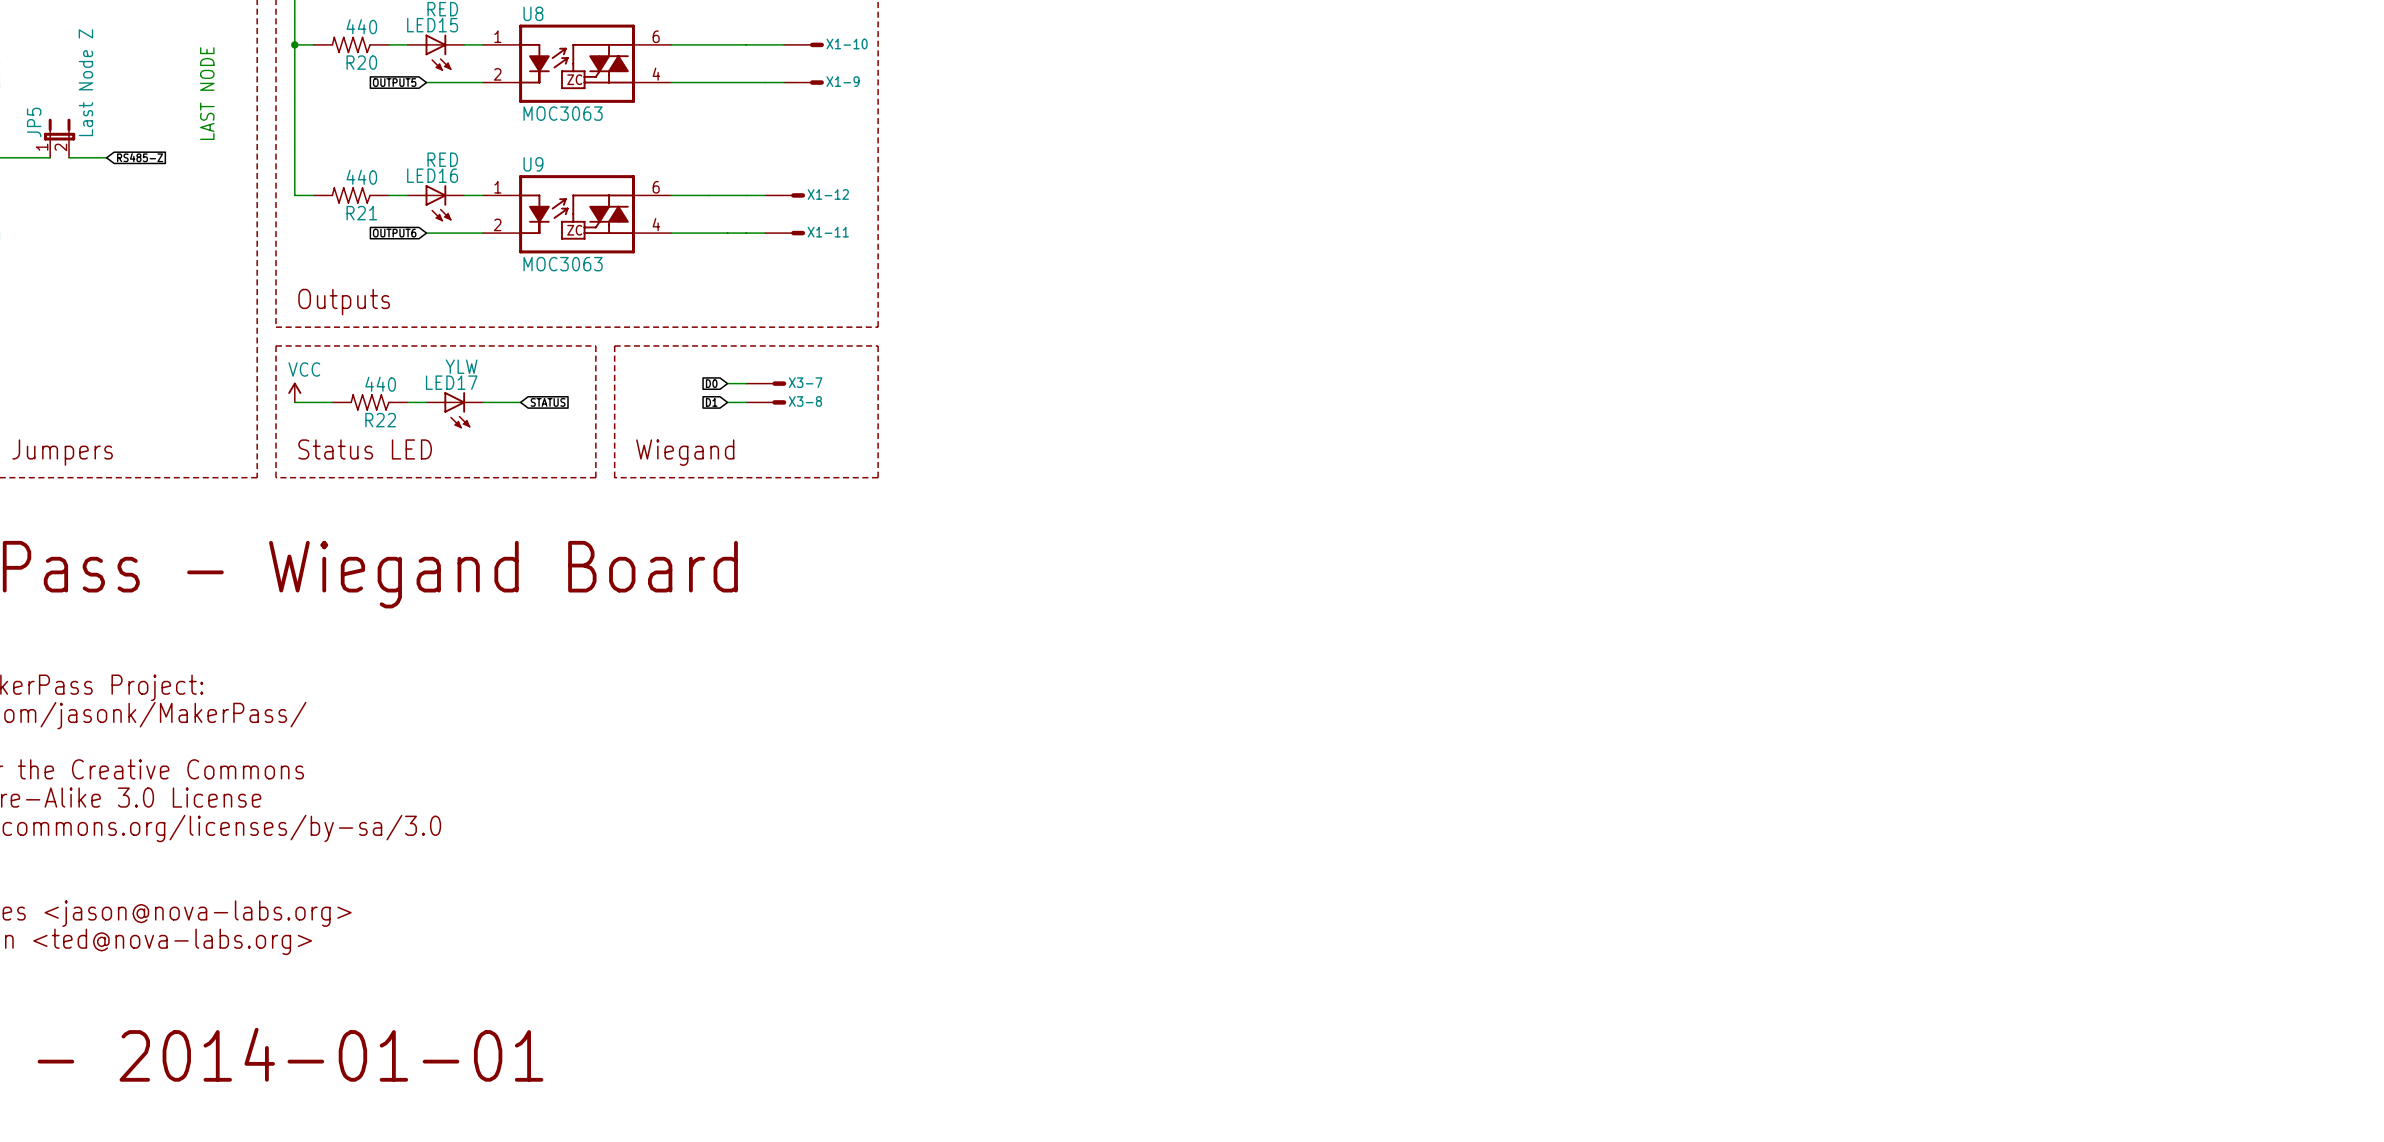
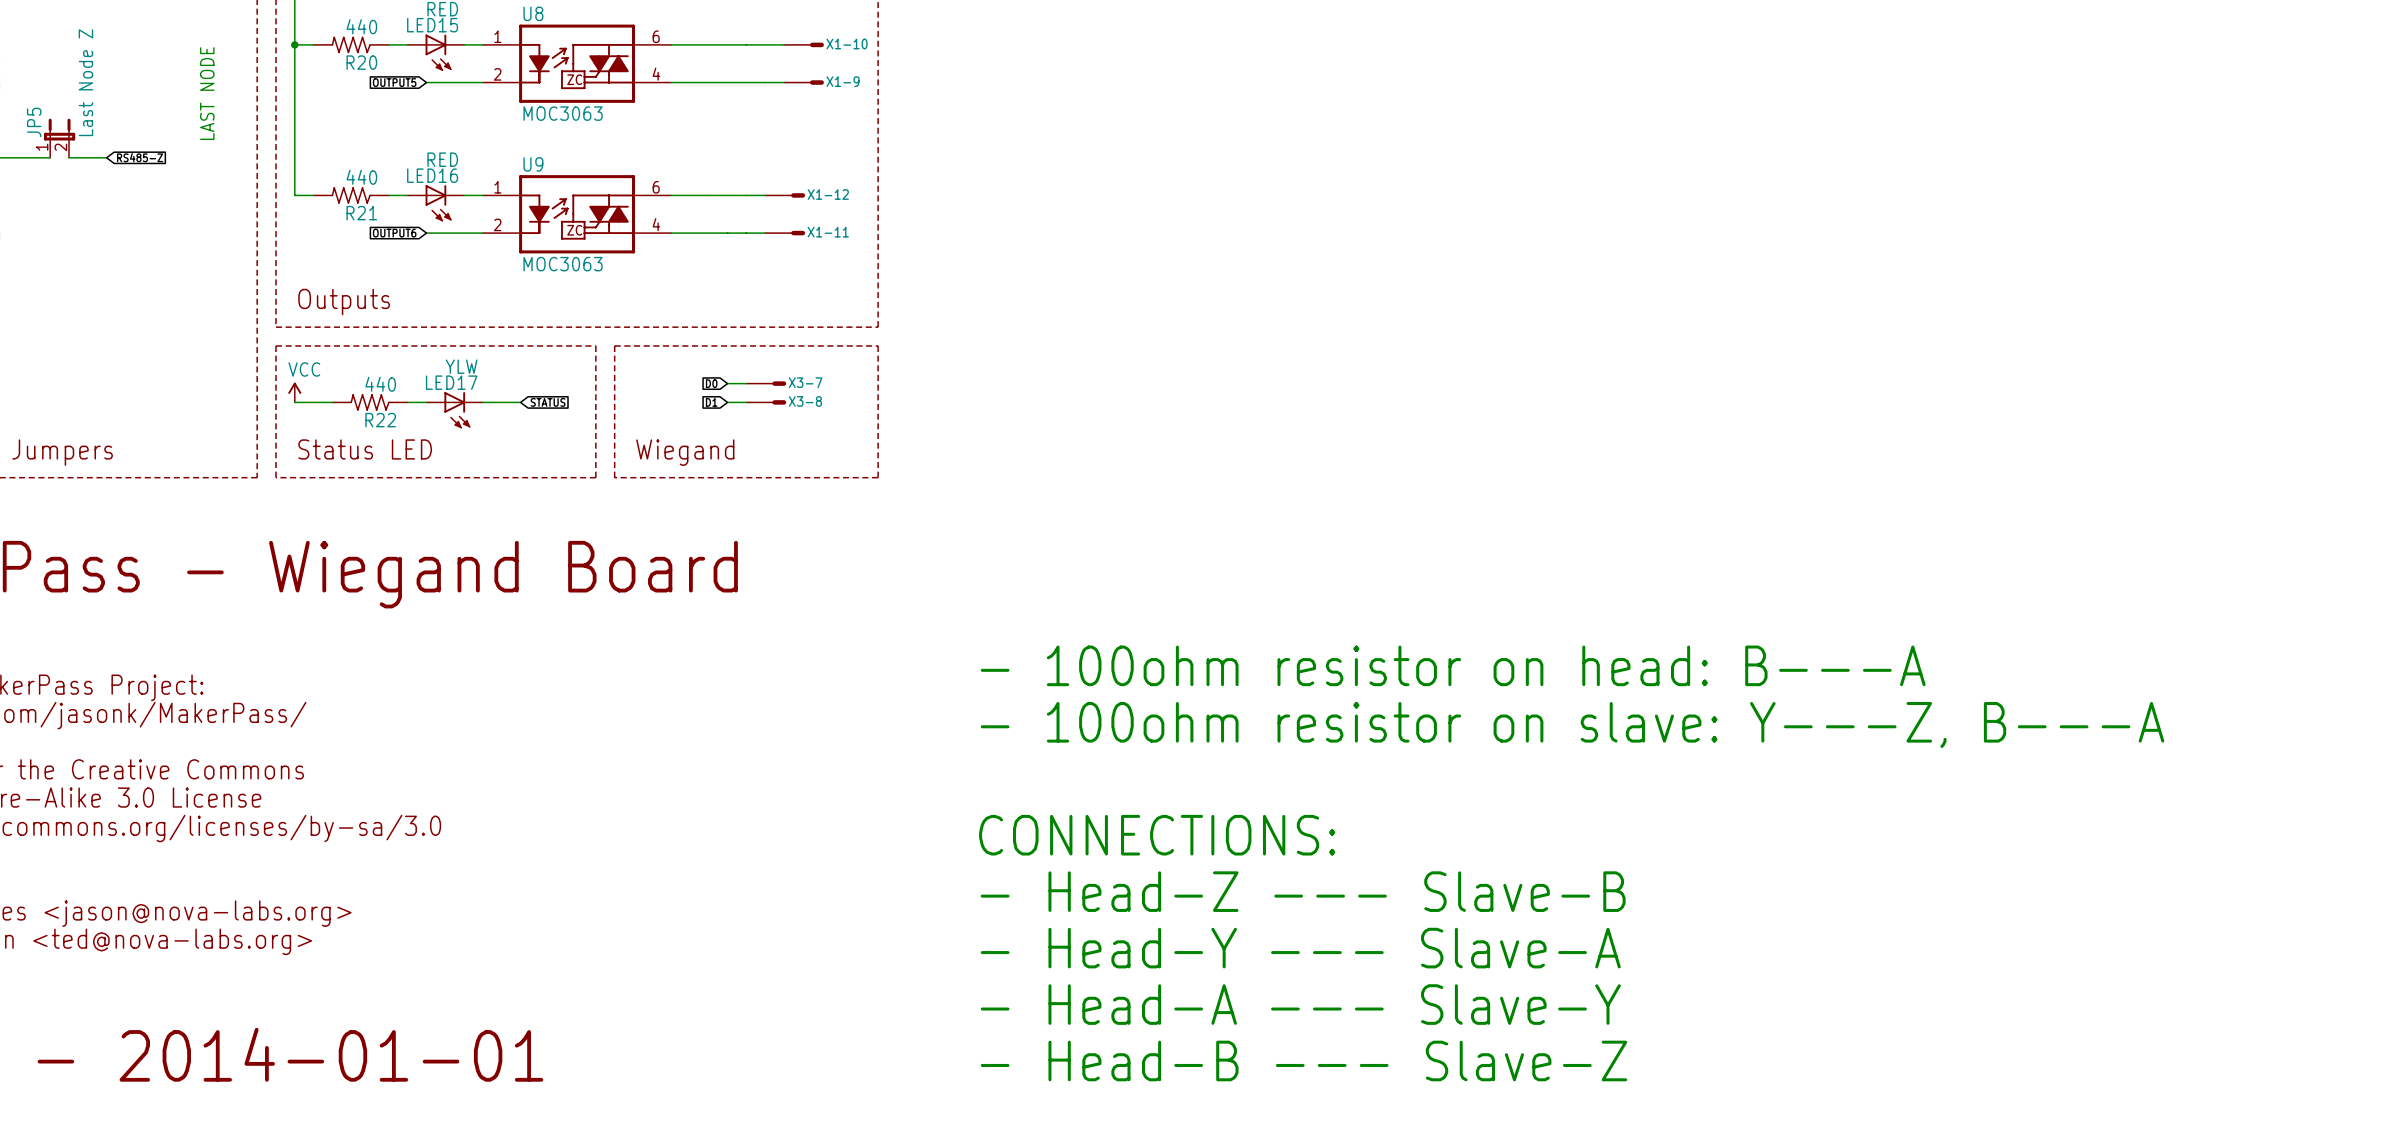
text: none -> - 100ohm resistor on head: B---A (1453, 665)
text: none -> - 100ohm resistor on slave: Y---Z, B---A (1572, 724)
text: none -> CONNECTIONS: (1157, 835)
text: none -> - Head-Z --- Slave-B (1303, 891)
text: none -> - Head-Y --- Slave-A (1300, 948)
text: none -> - Head-A --- Slave-Y (1300, 1004)
text: none -> - Head-B --- Slave-Z (1303, 1060)

